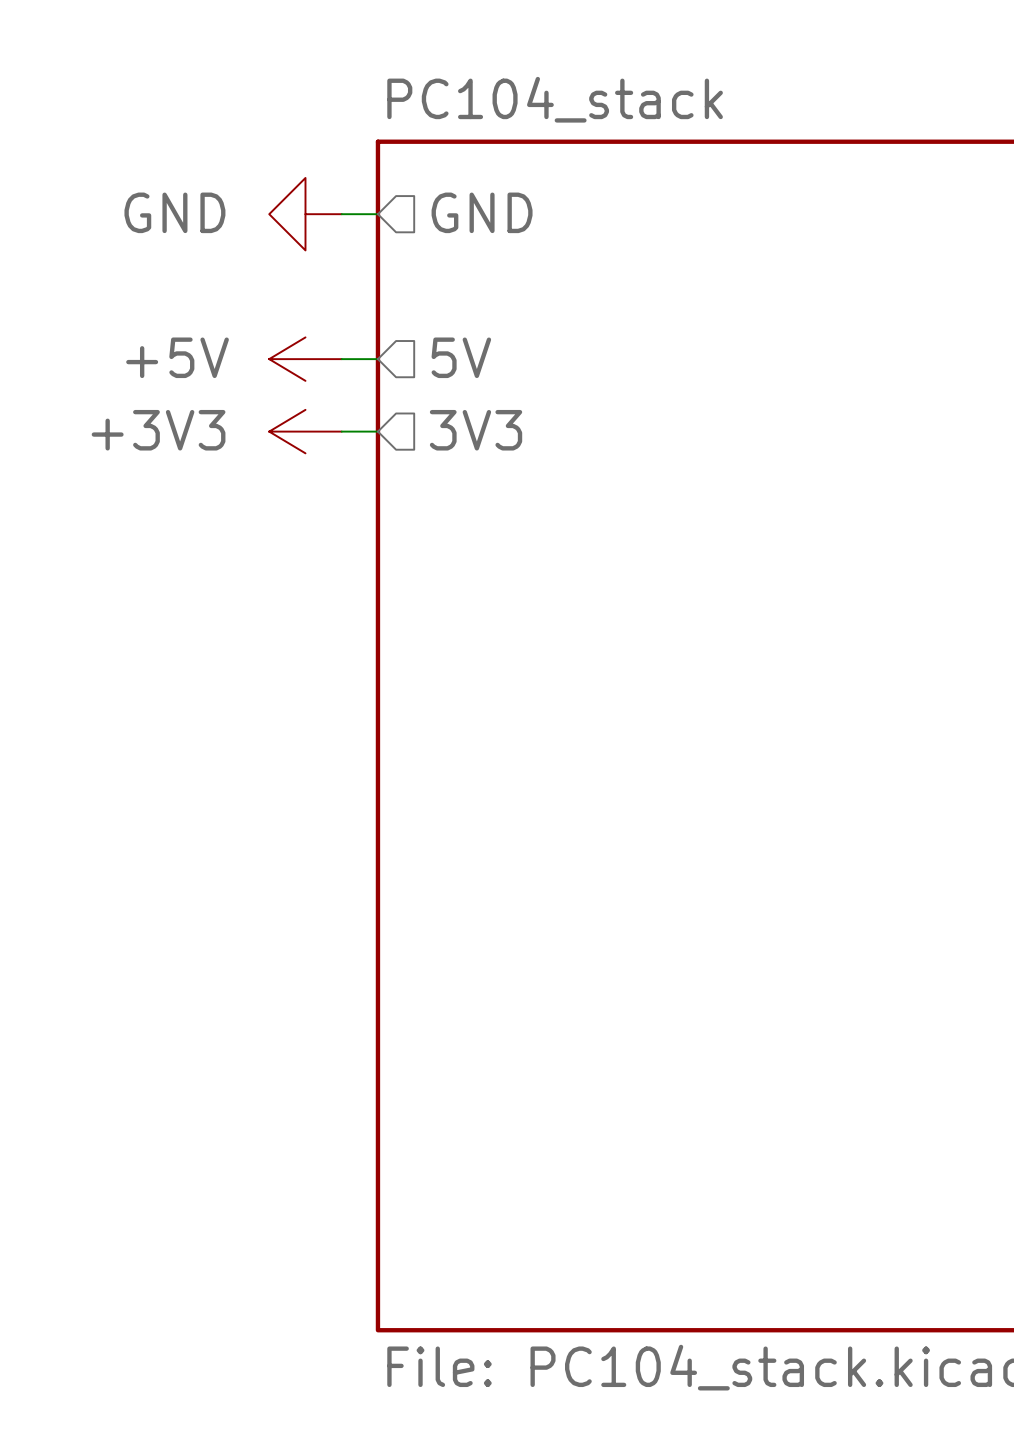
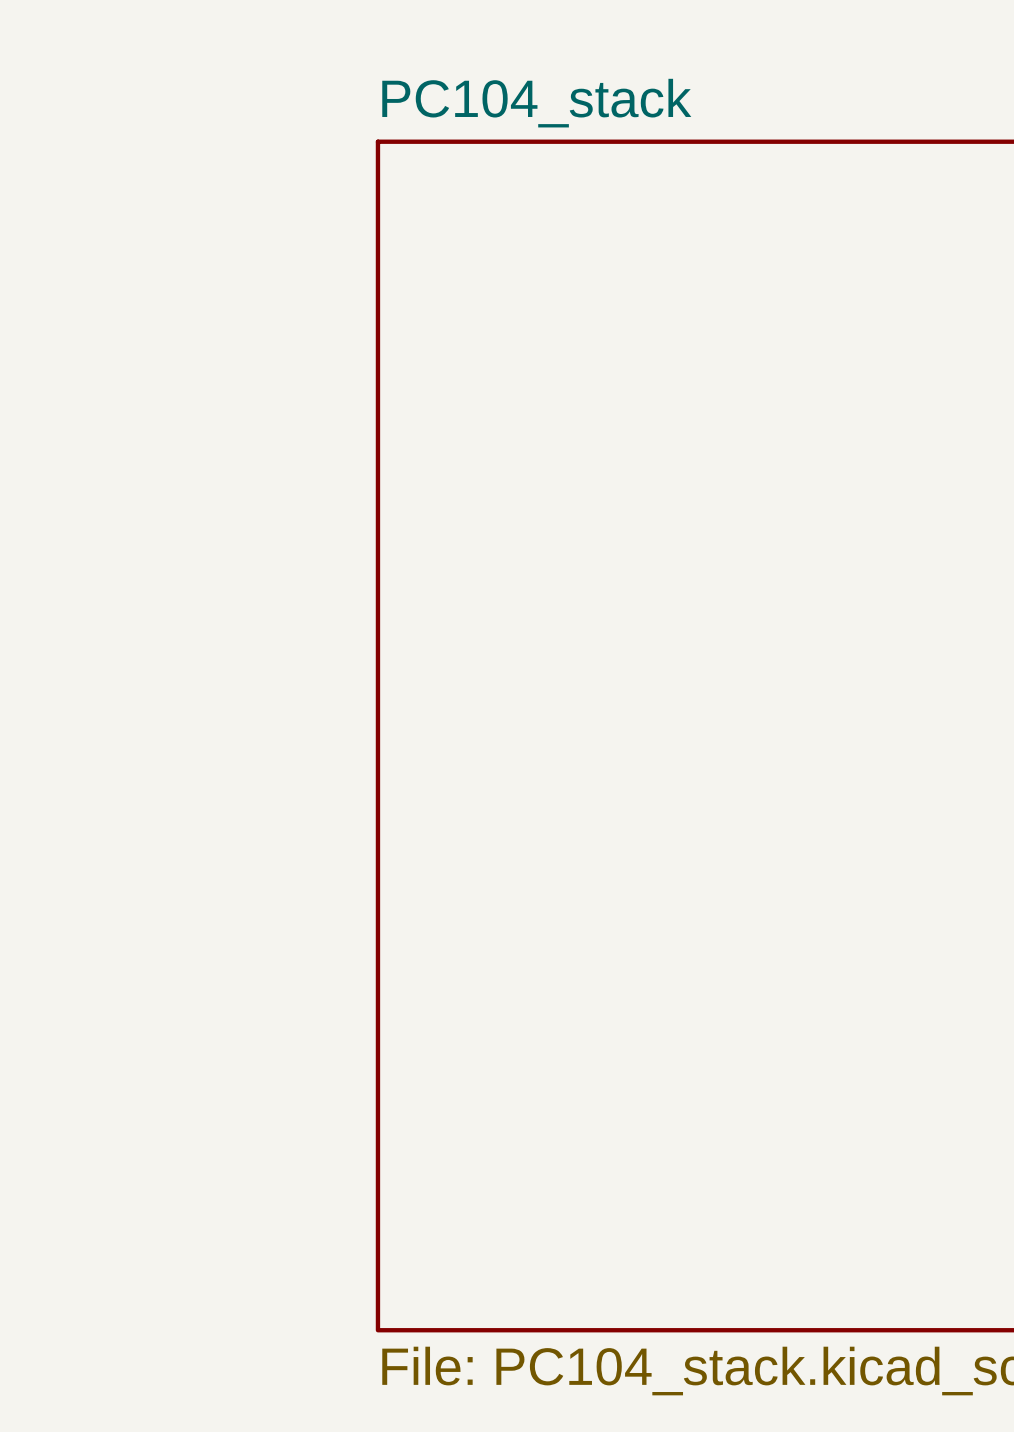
sheet pin: GND (482, 212) -> none
power symbol: GND (305, 214) -> none
wire: (341, 214) (377, 214) -> none
sheet pin: 5V (461, 357) -> none
power symbol: +5V (305, 359) -> none
wire: (341, 359) (377, 359) -> none
sheet pin: 3V3 (476, 430) -> none
power symbol: +3V3 (305, 431) -> none
wire: (341, 431) (377, 431) -> none

